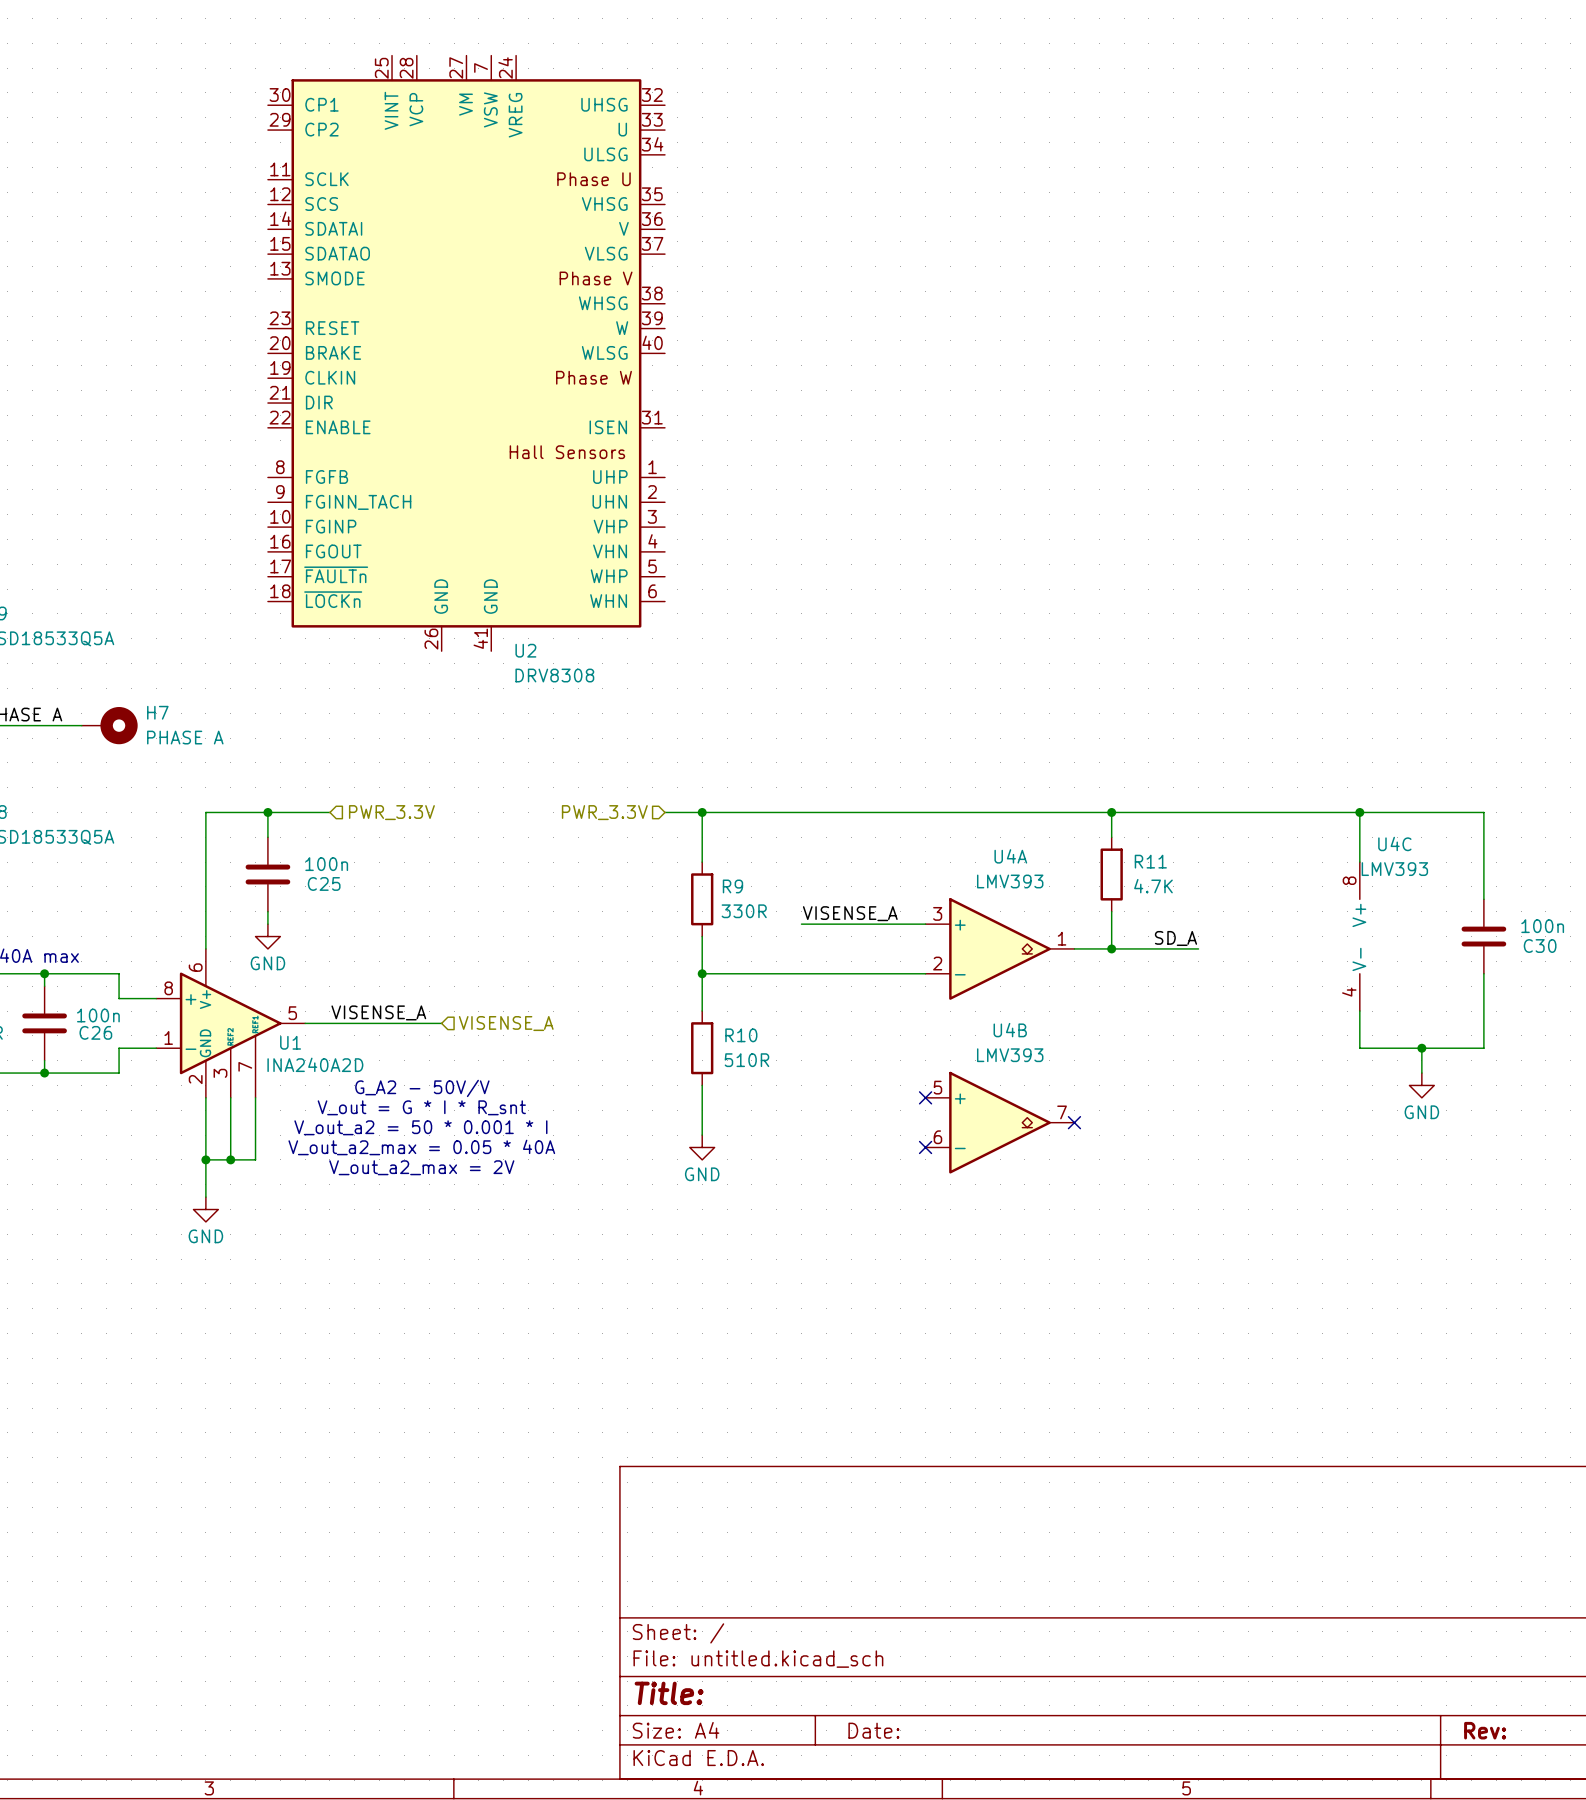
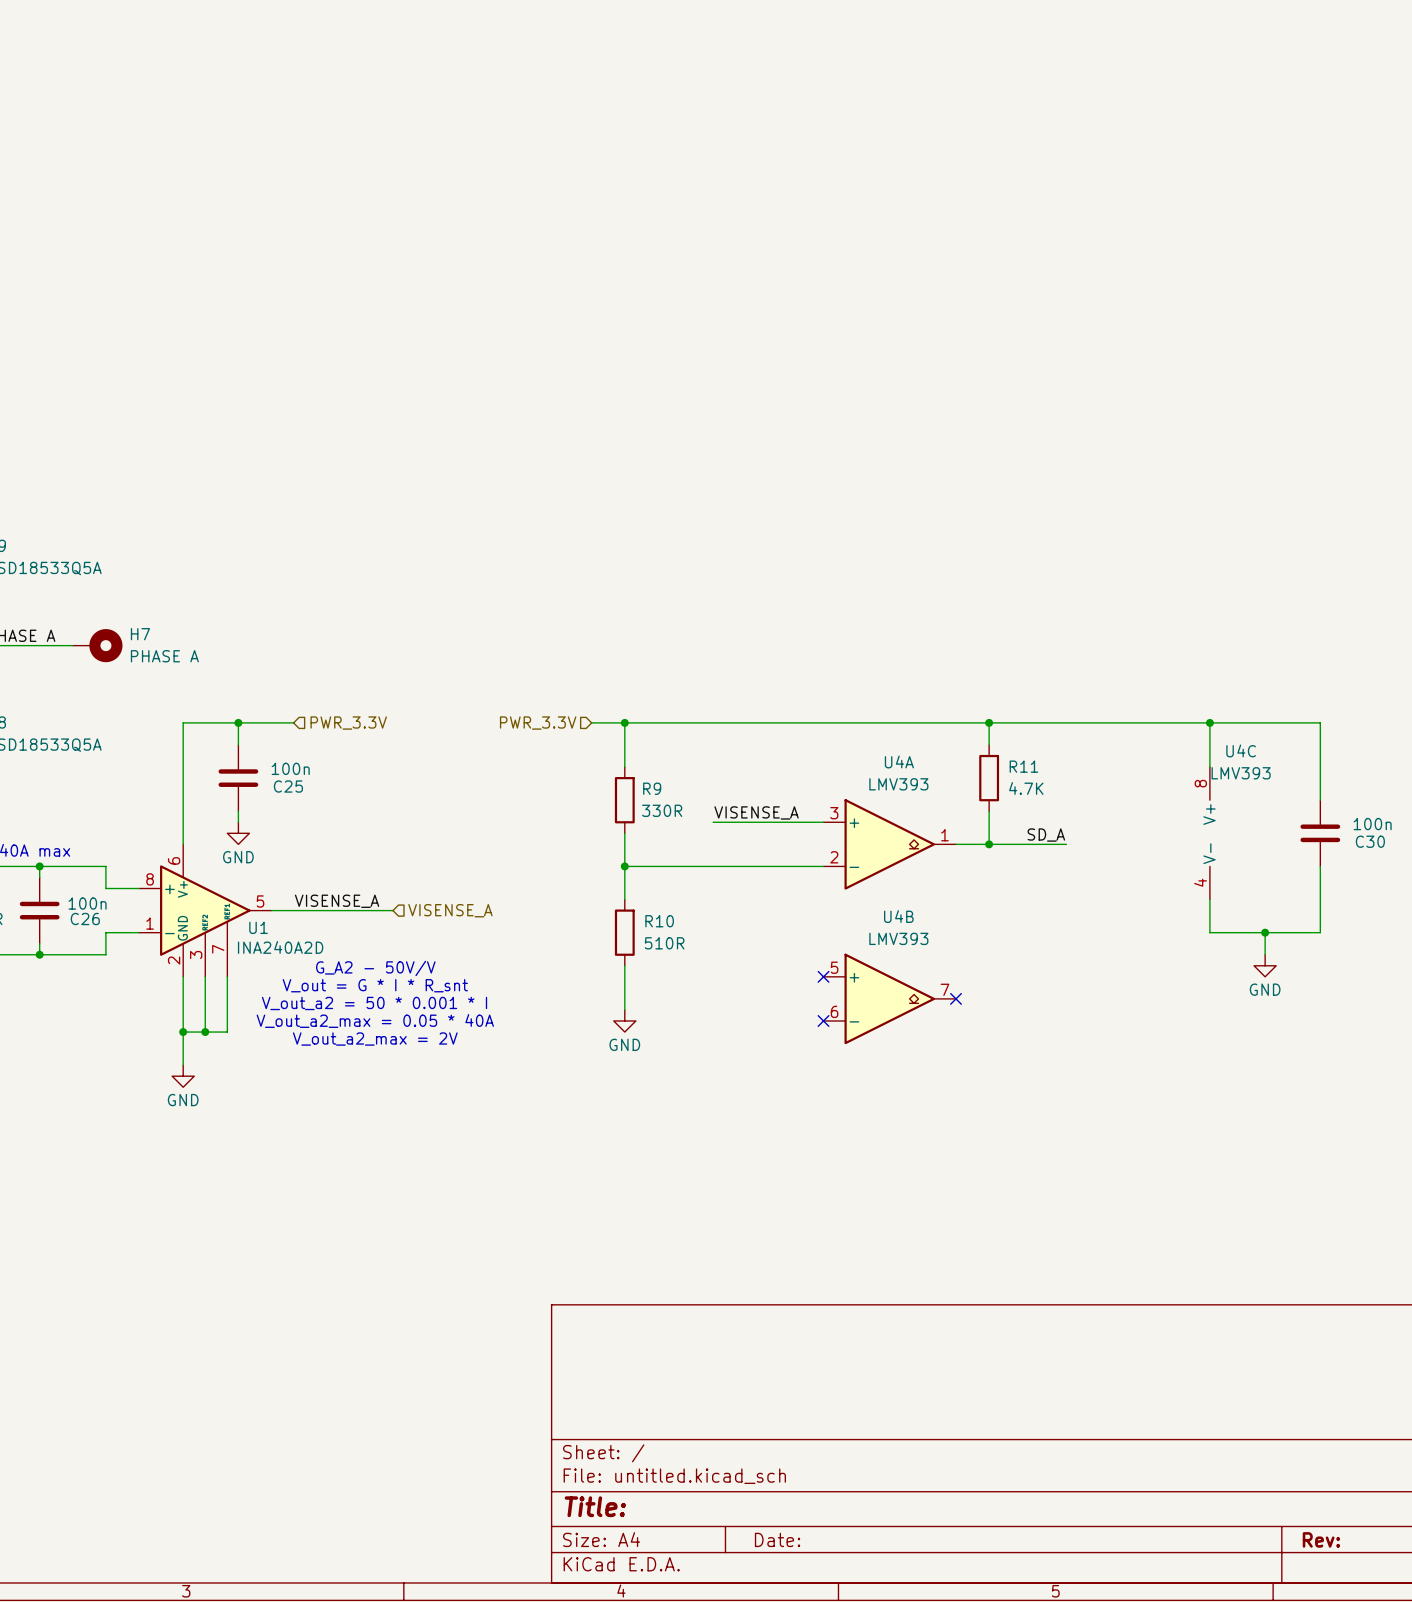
U2: DRV8308 (466, 353) -> none

